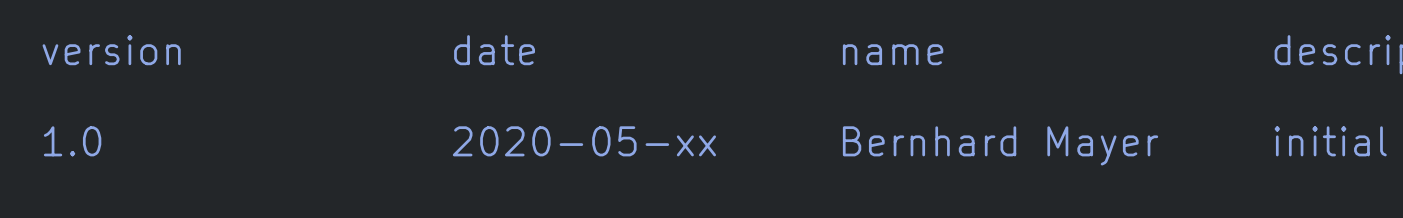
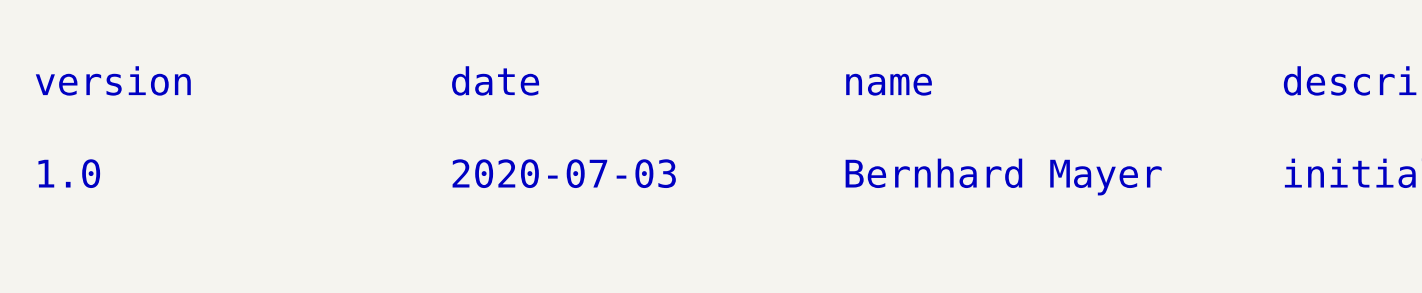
text: 2020-05-xx (584, 141) -> 2020-07-03 (564, 173)

